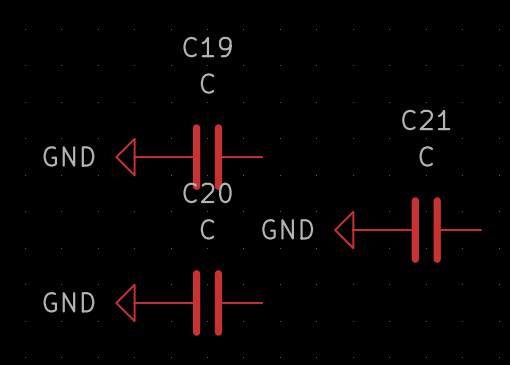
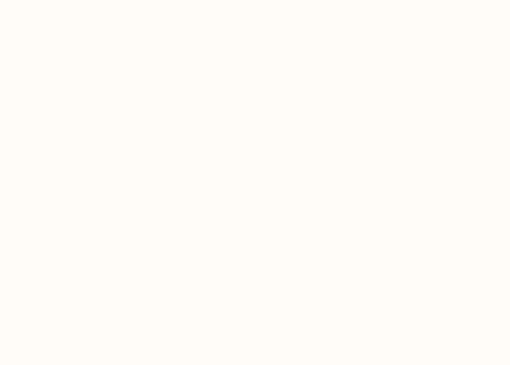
power symbol: GND (134, 157) -> none
C19: C (207, 157) -> none
power symbol: GND (353, 230) -> none
C21: C (426, 230) -> none
power symbol: GND (134, 302) -> none
C20: C (207, 302) -> none

